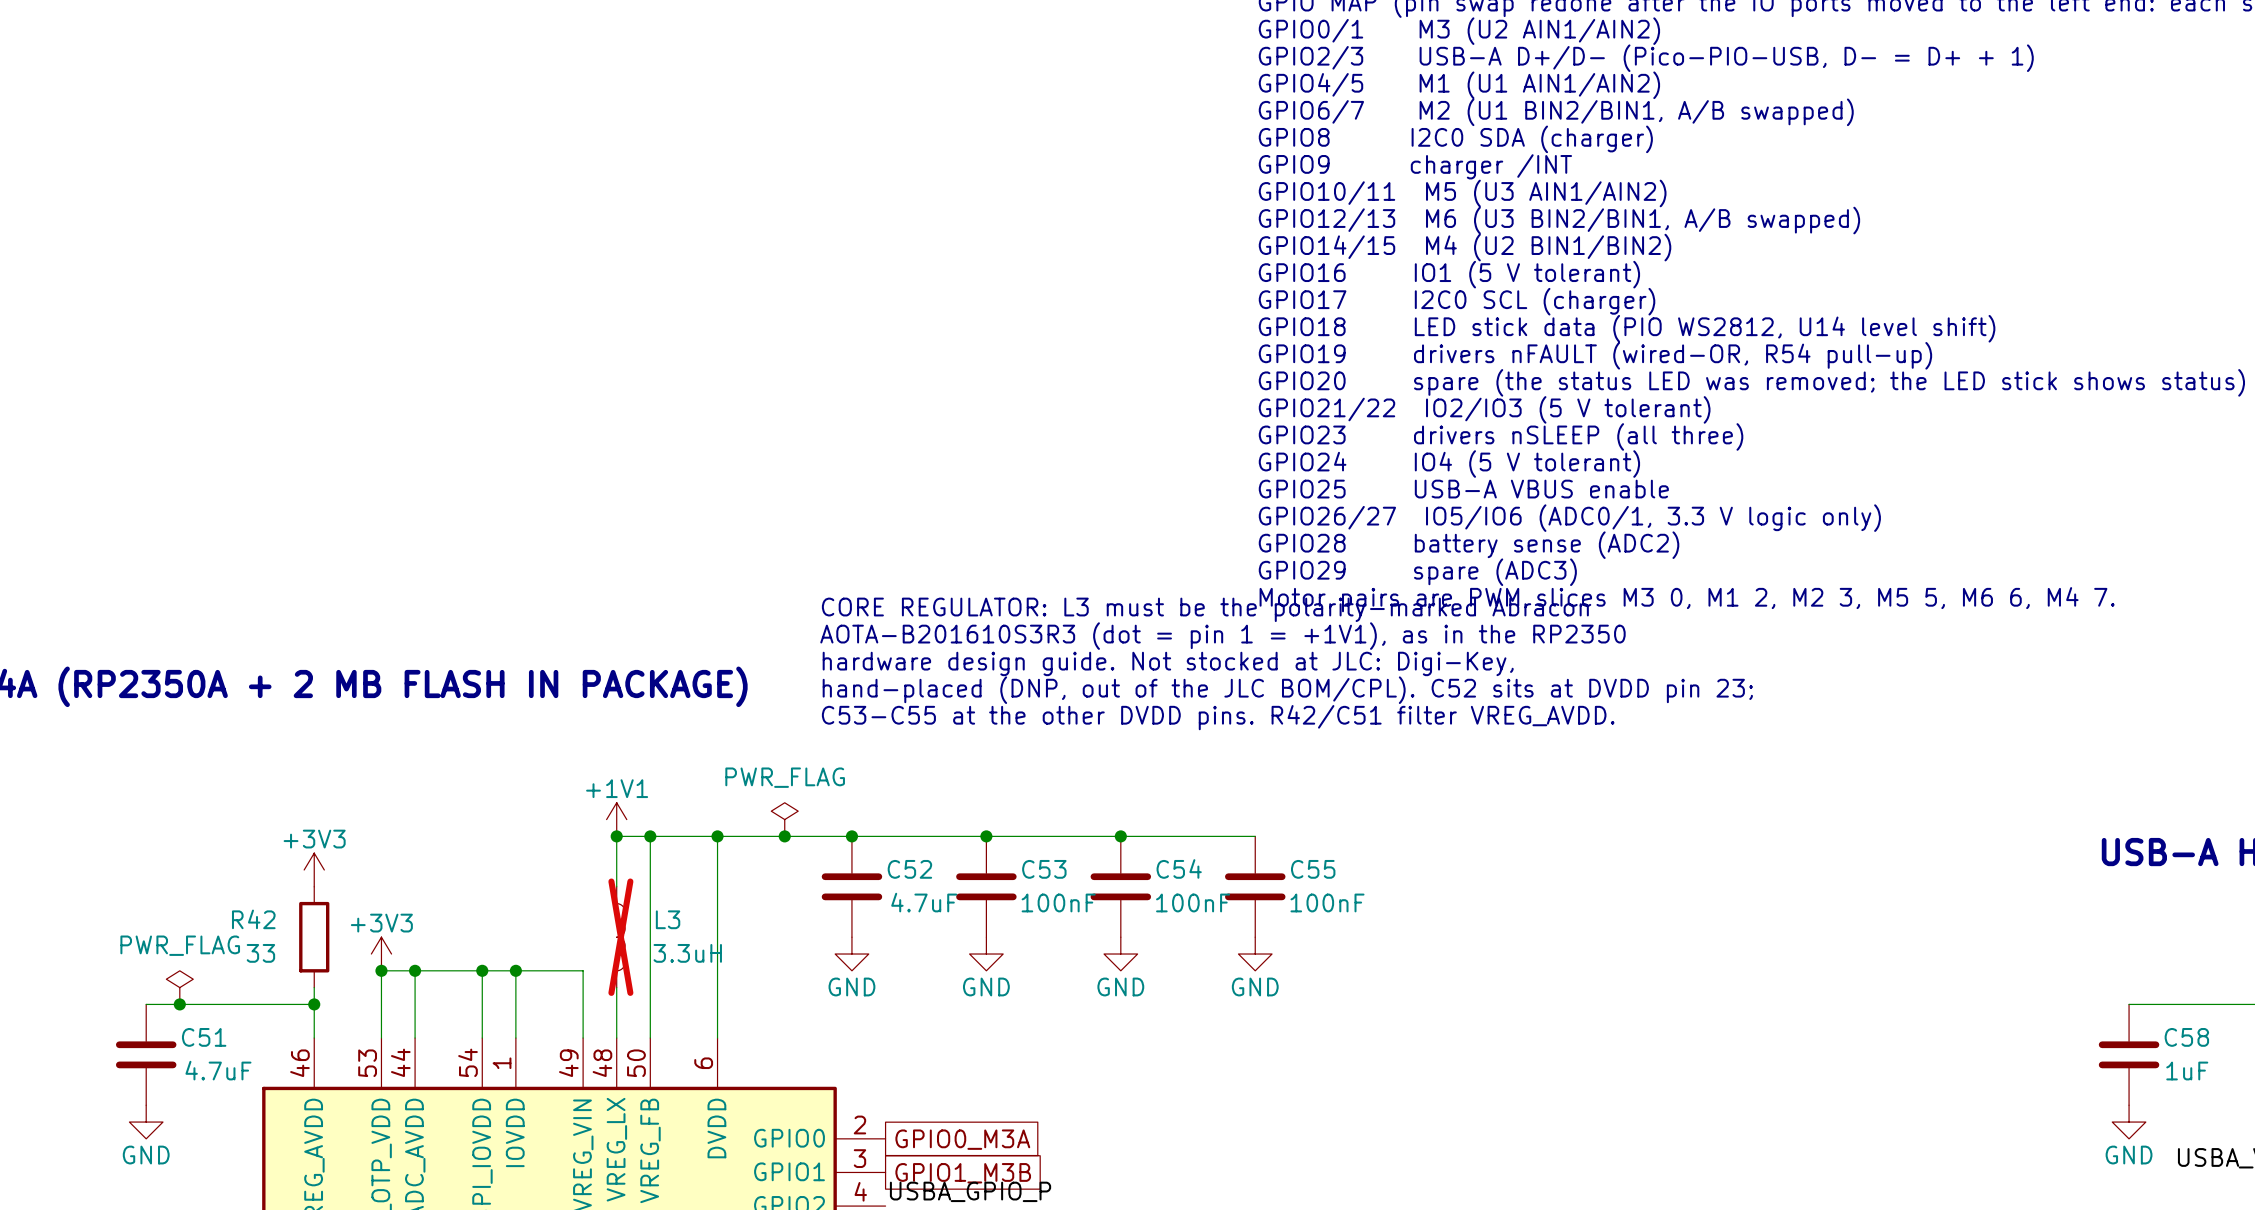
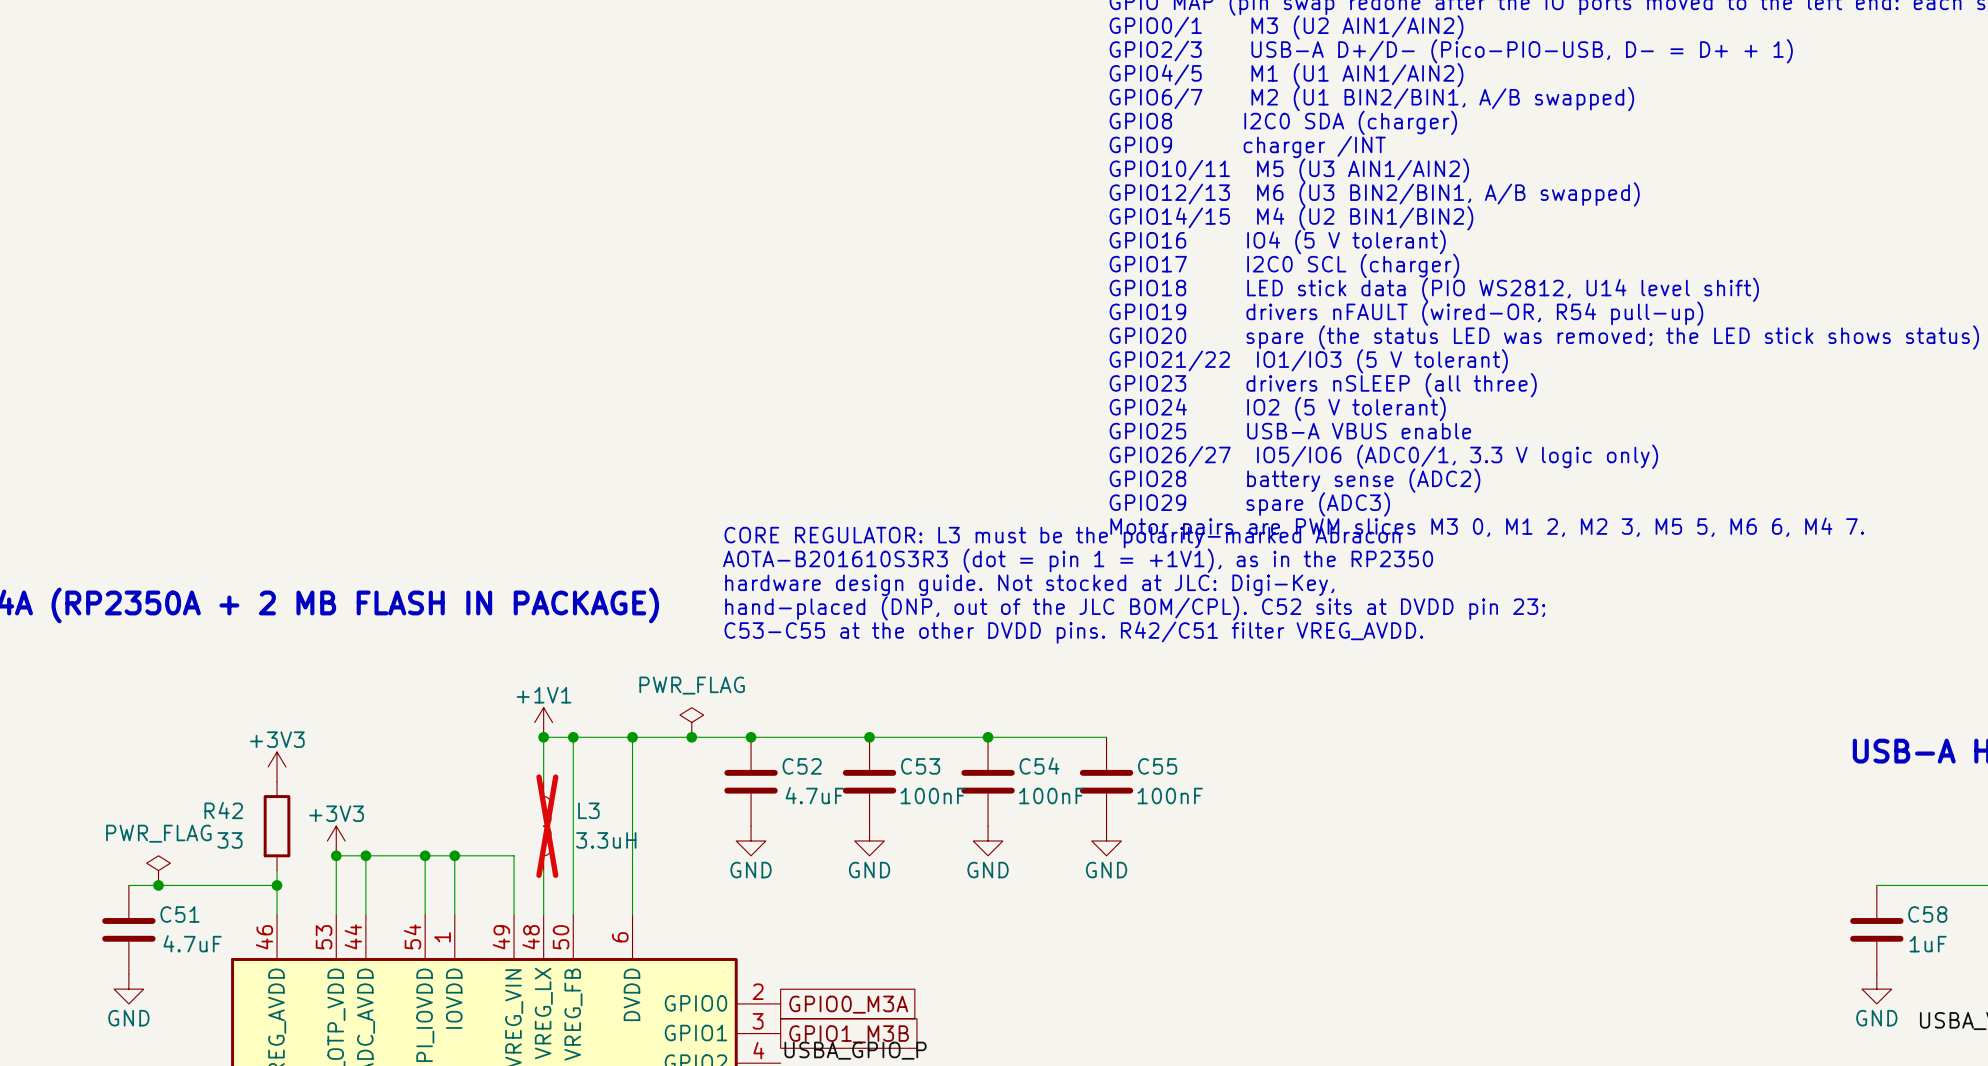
text: GPIO16 IO1 (5 V tolerant) (1449, 274) -> GPIO16 IO4 (5 V tolerant) (1277, 242)
text: GPIO21/22 IO2/IO3 (5 V tolerant) (1484, 409) -> GPIO21/22 IO1/IO3 (5 V tolerant) (1308, 361)
text: GPIO24 IO4 (5 V tolerant) (1449, 464) -> GPIO24 IO2 (5 V tolerant) (1277, 409)

